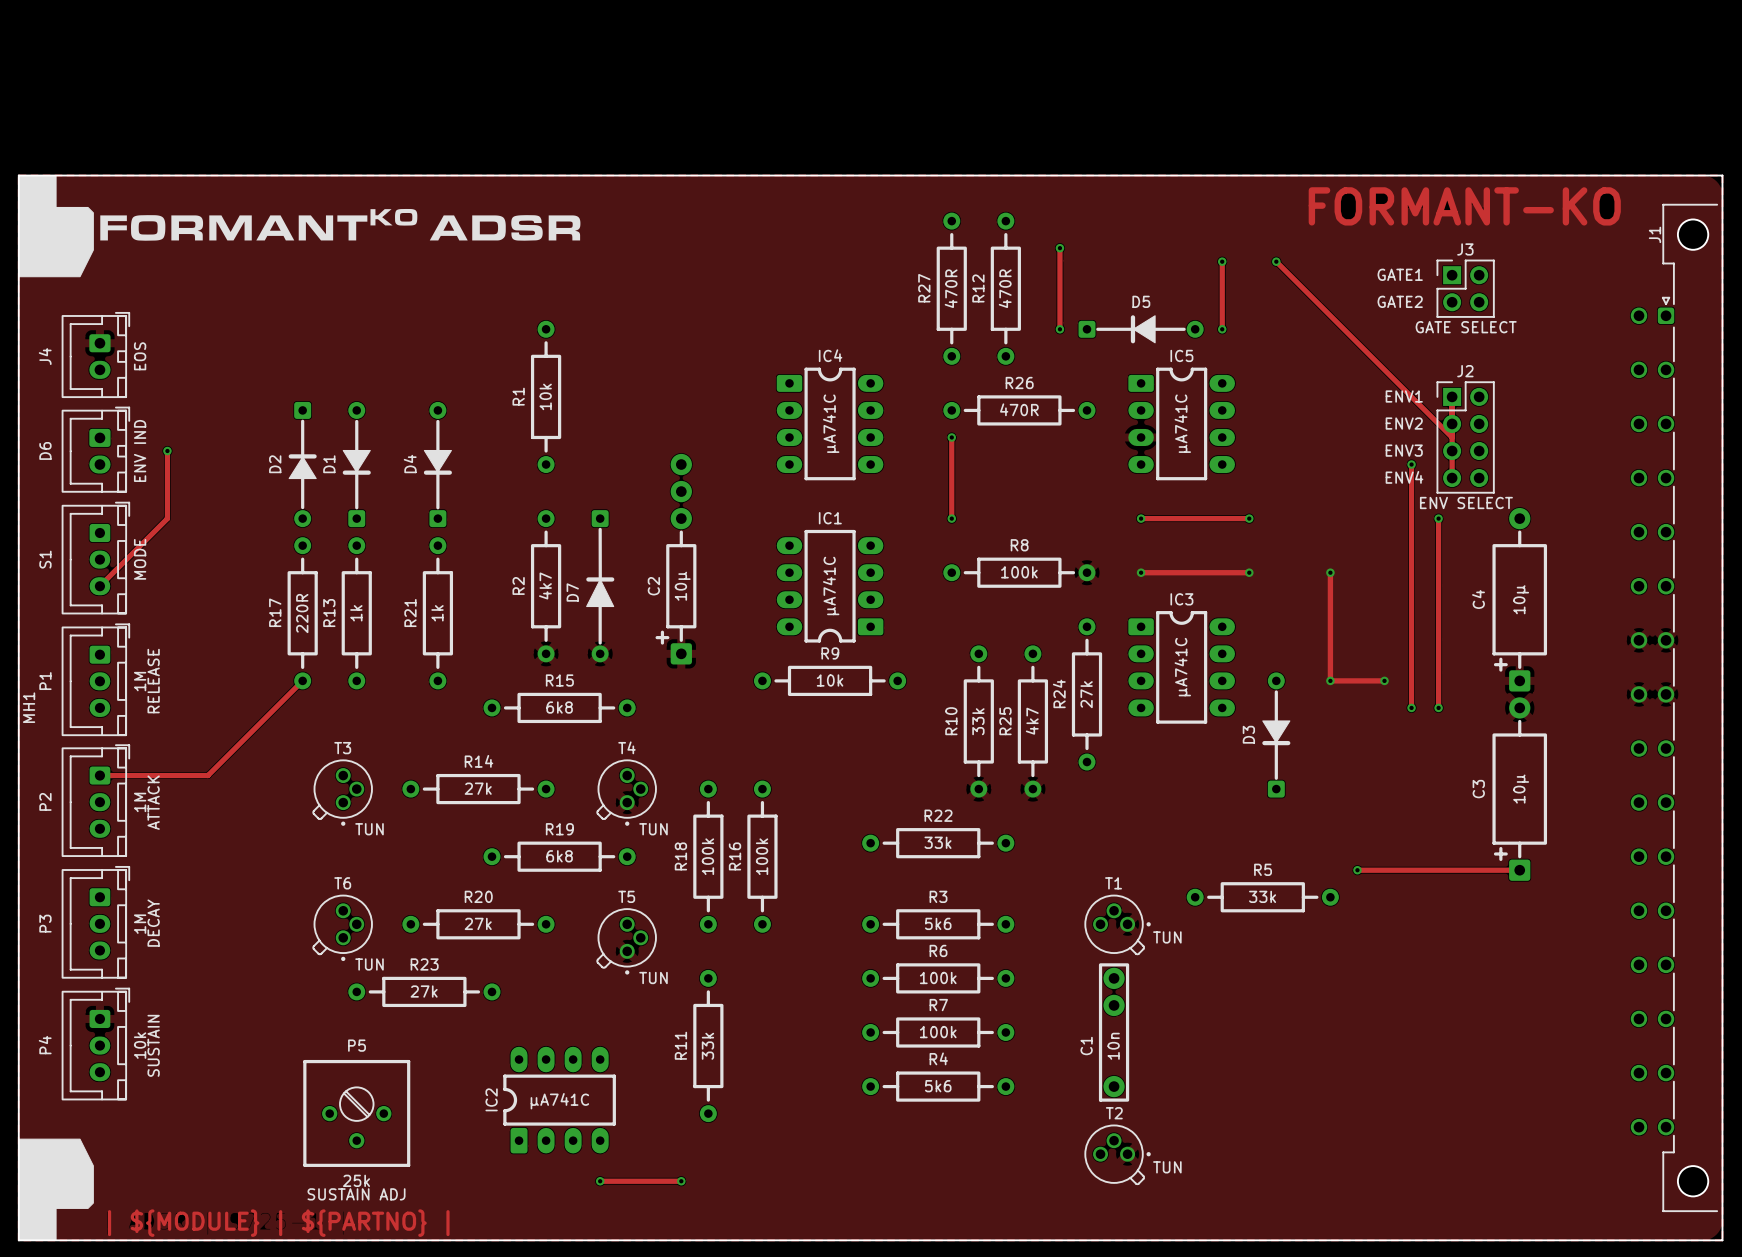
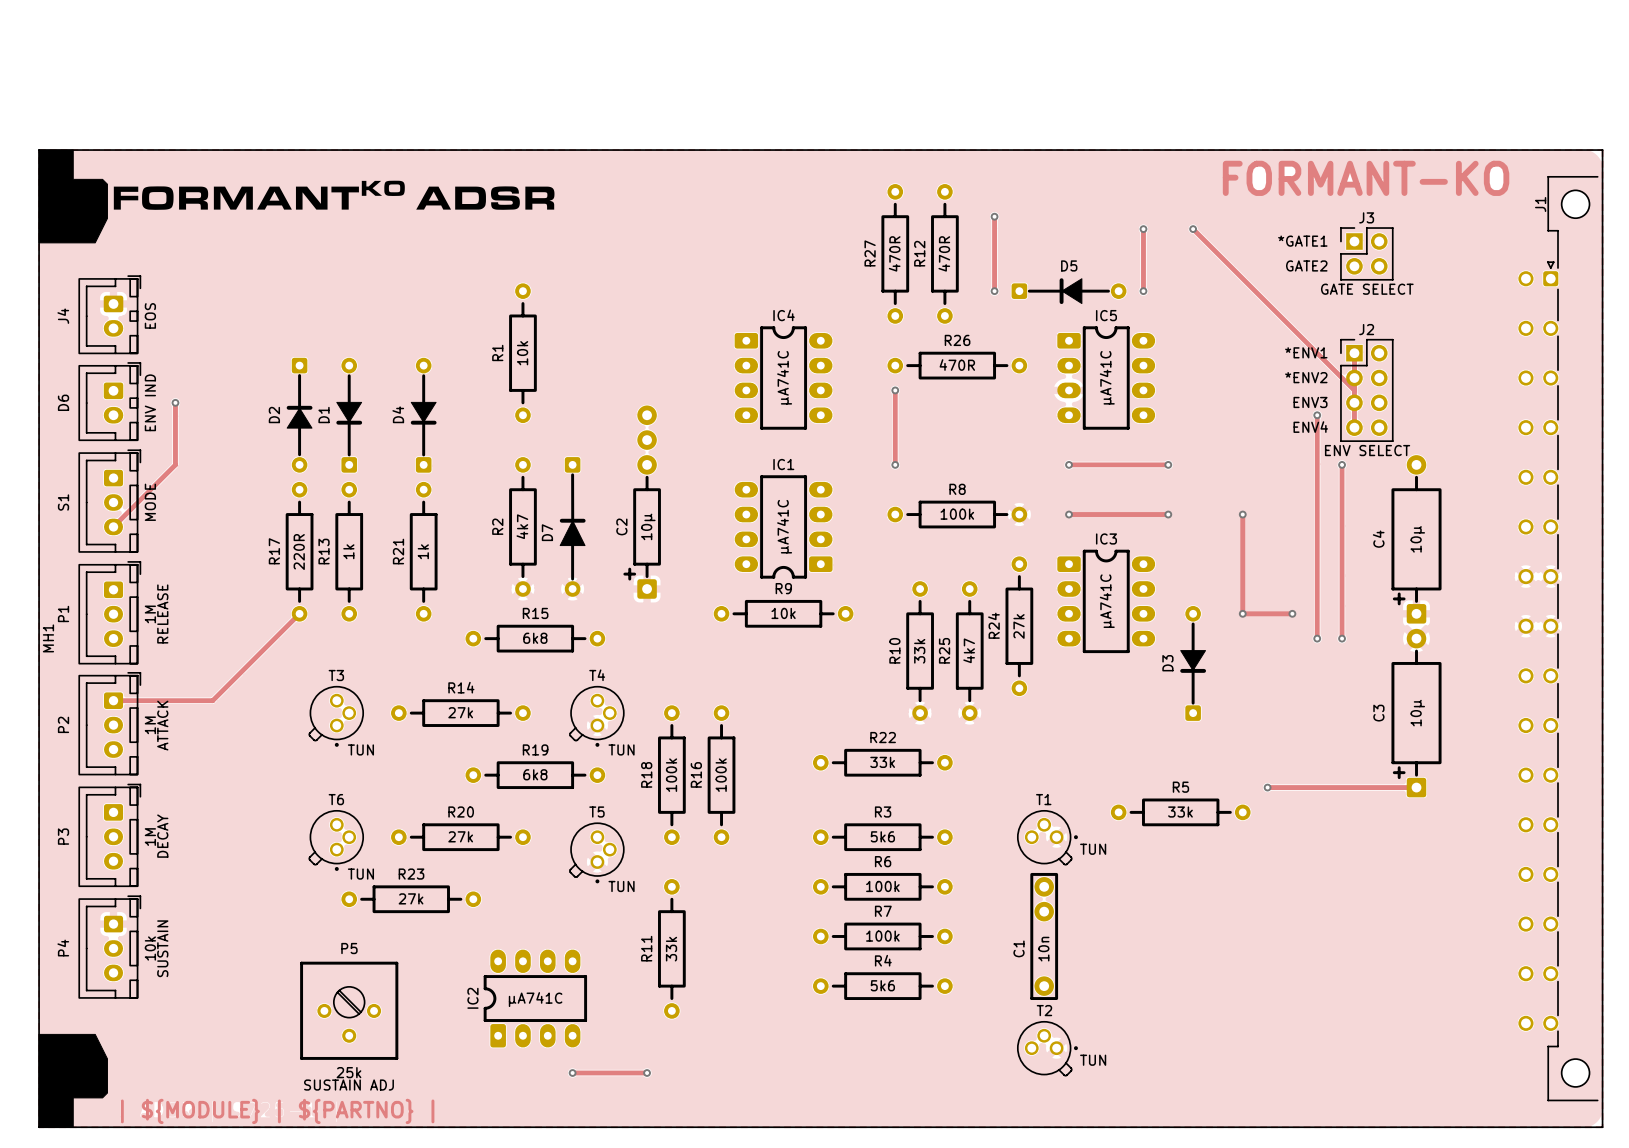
text: GATE1 (1400, 274) -> *GATE1 (1302, 241)
text: ENV1 (1404, 396) -> *ENV1 (1306, 352)
text: ENV2 (1404, 423) -> *ENV2 (1306, 377)

